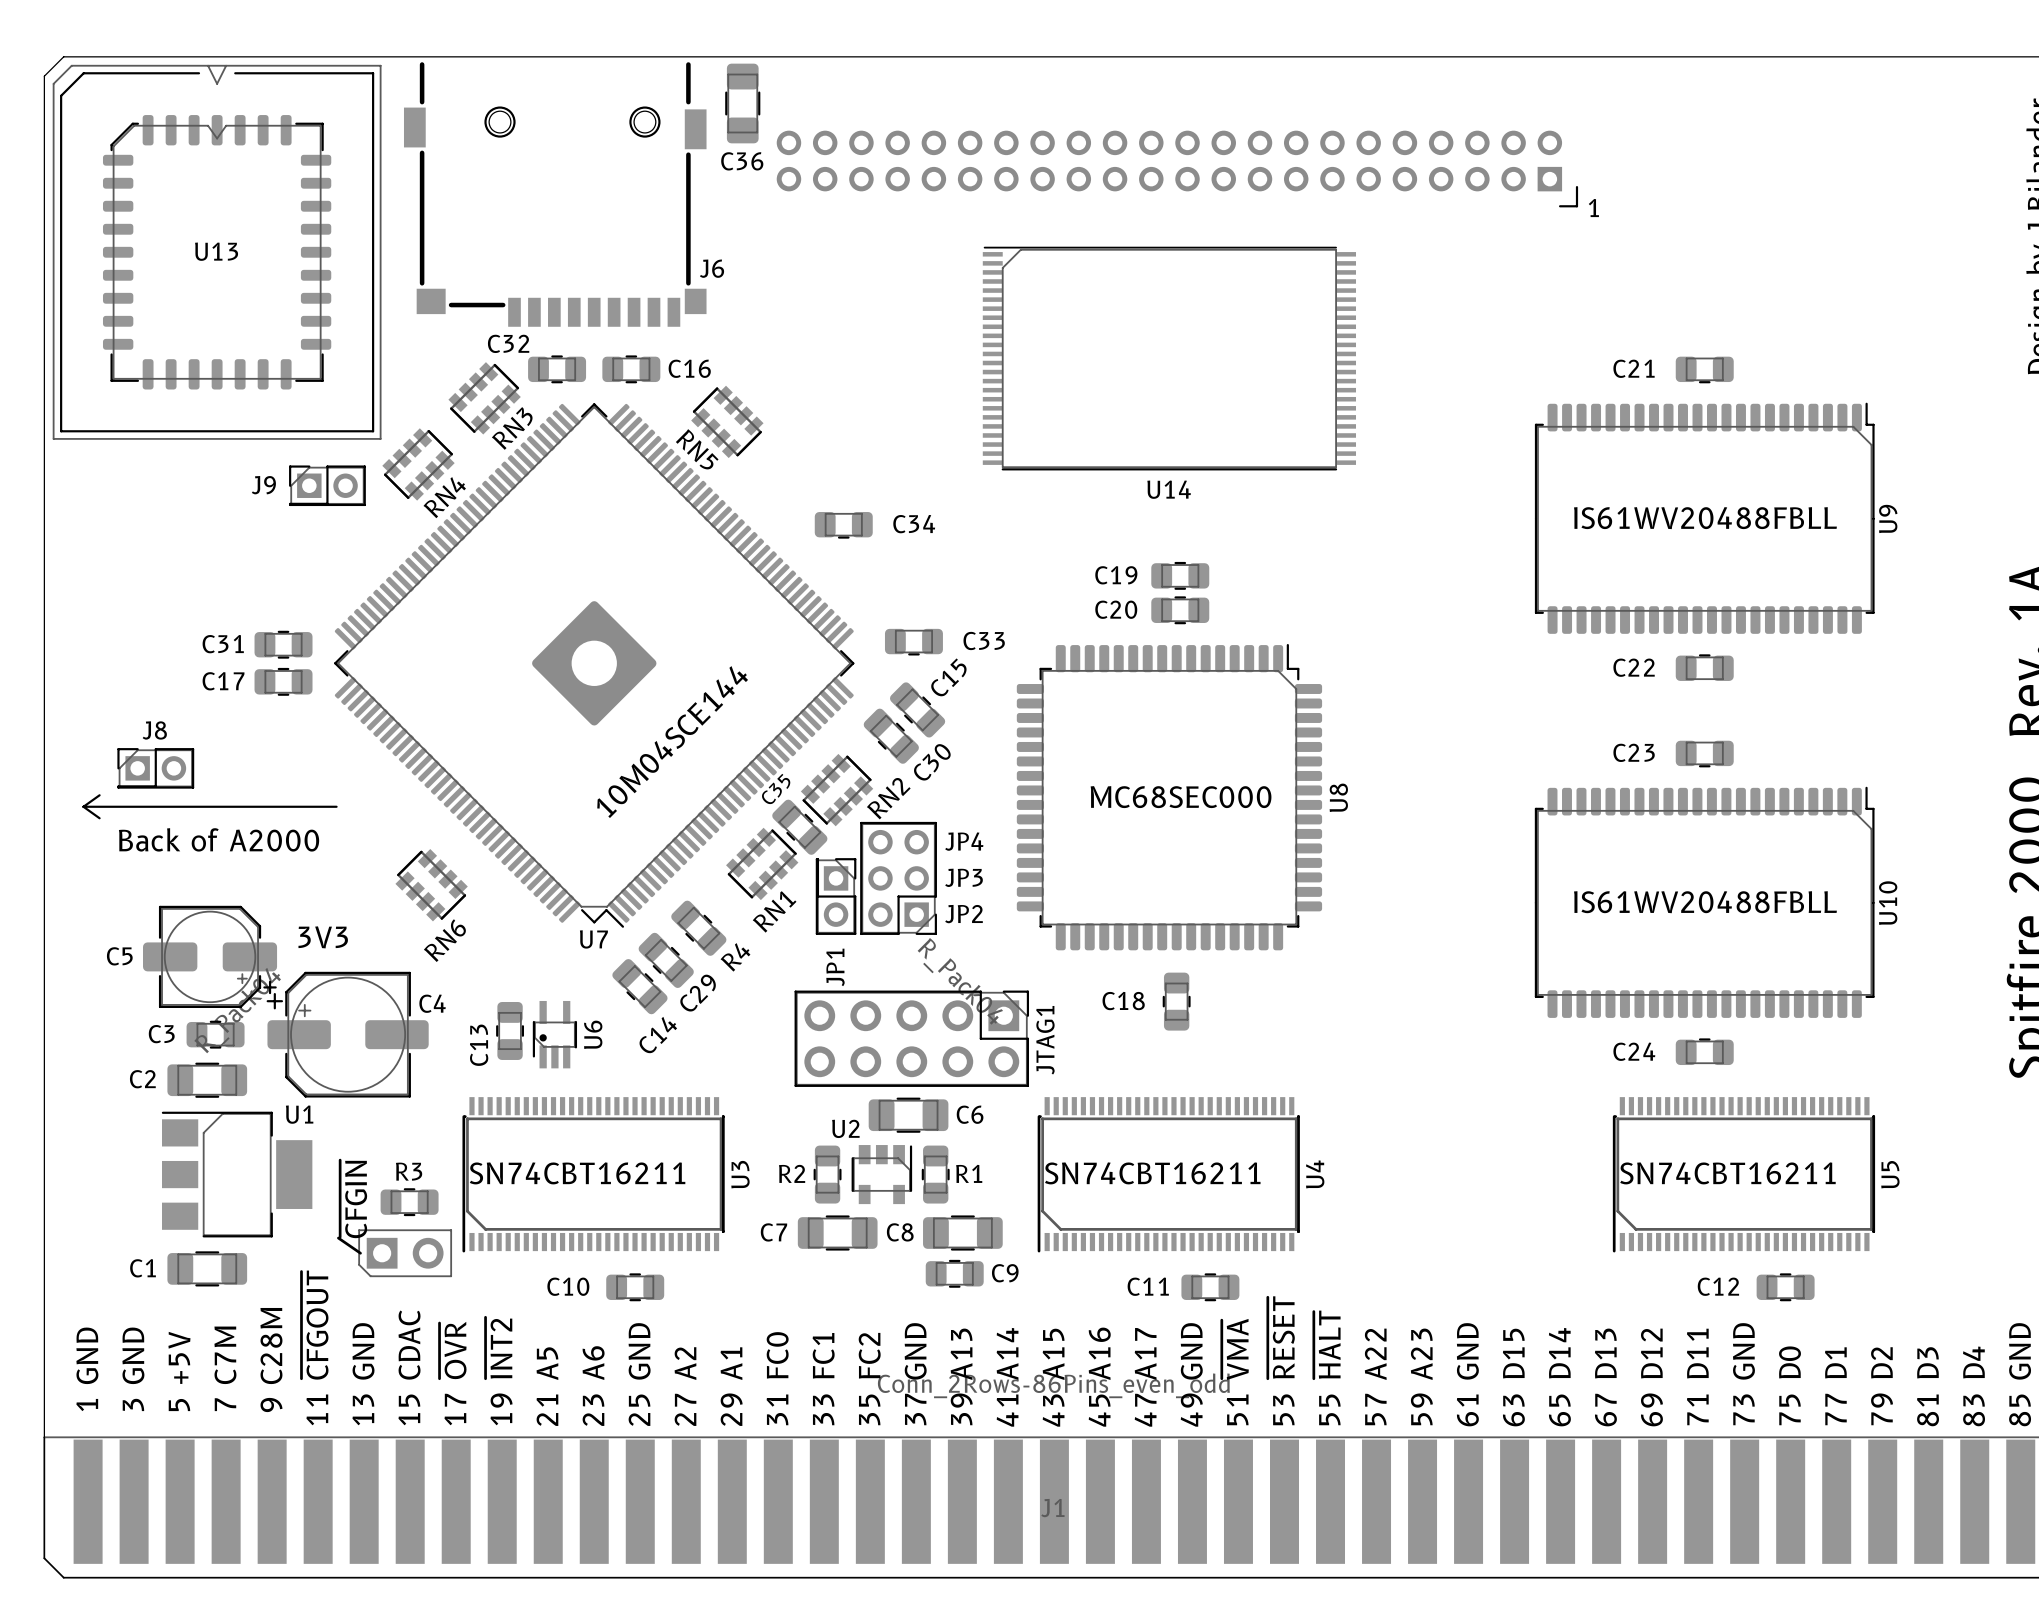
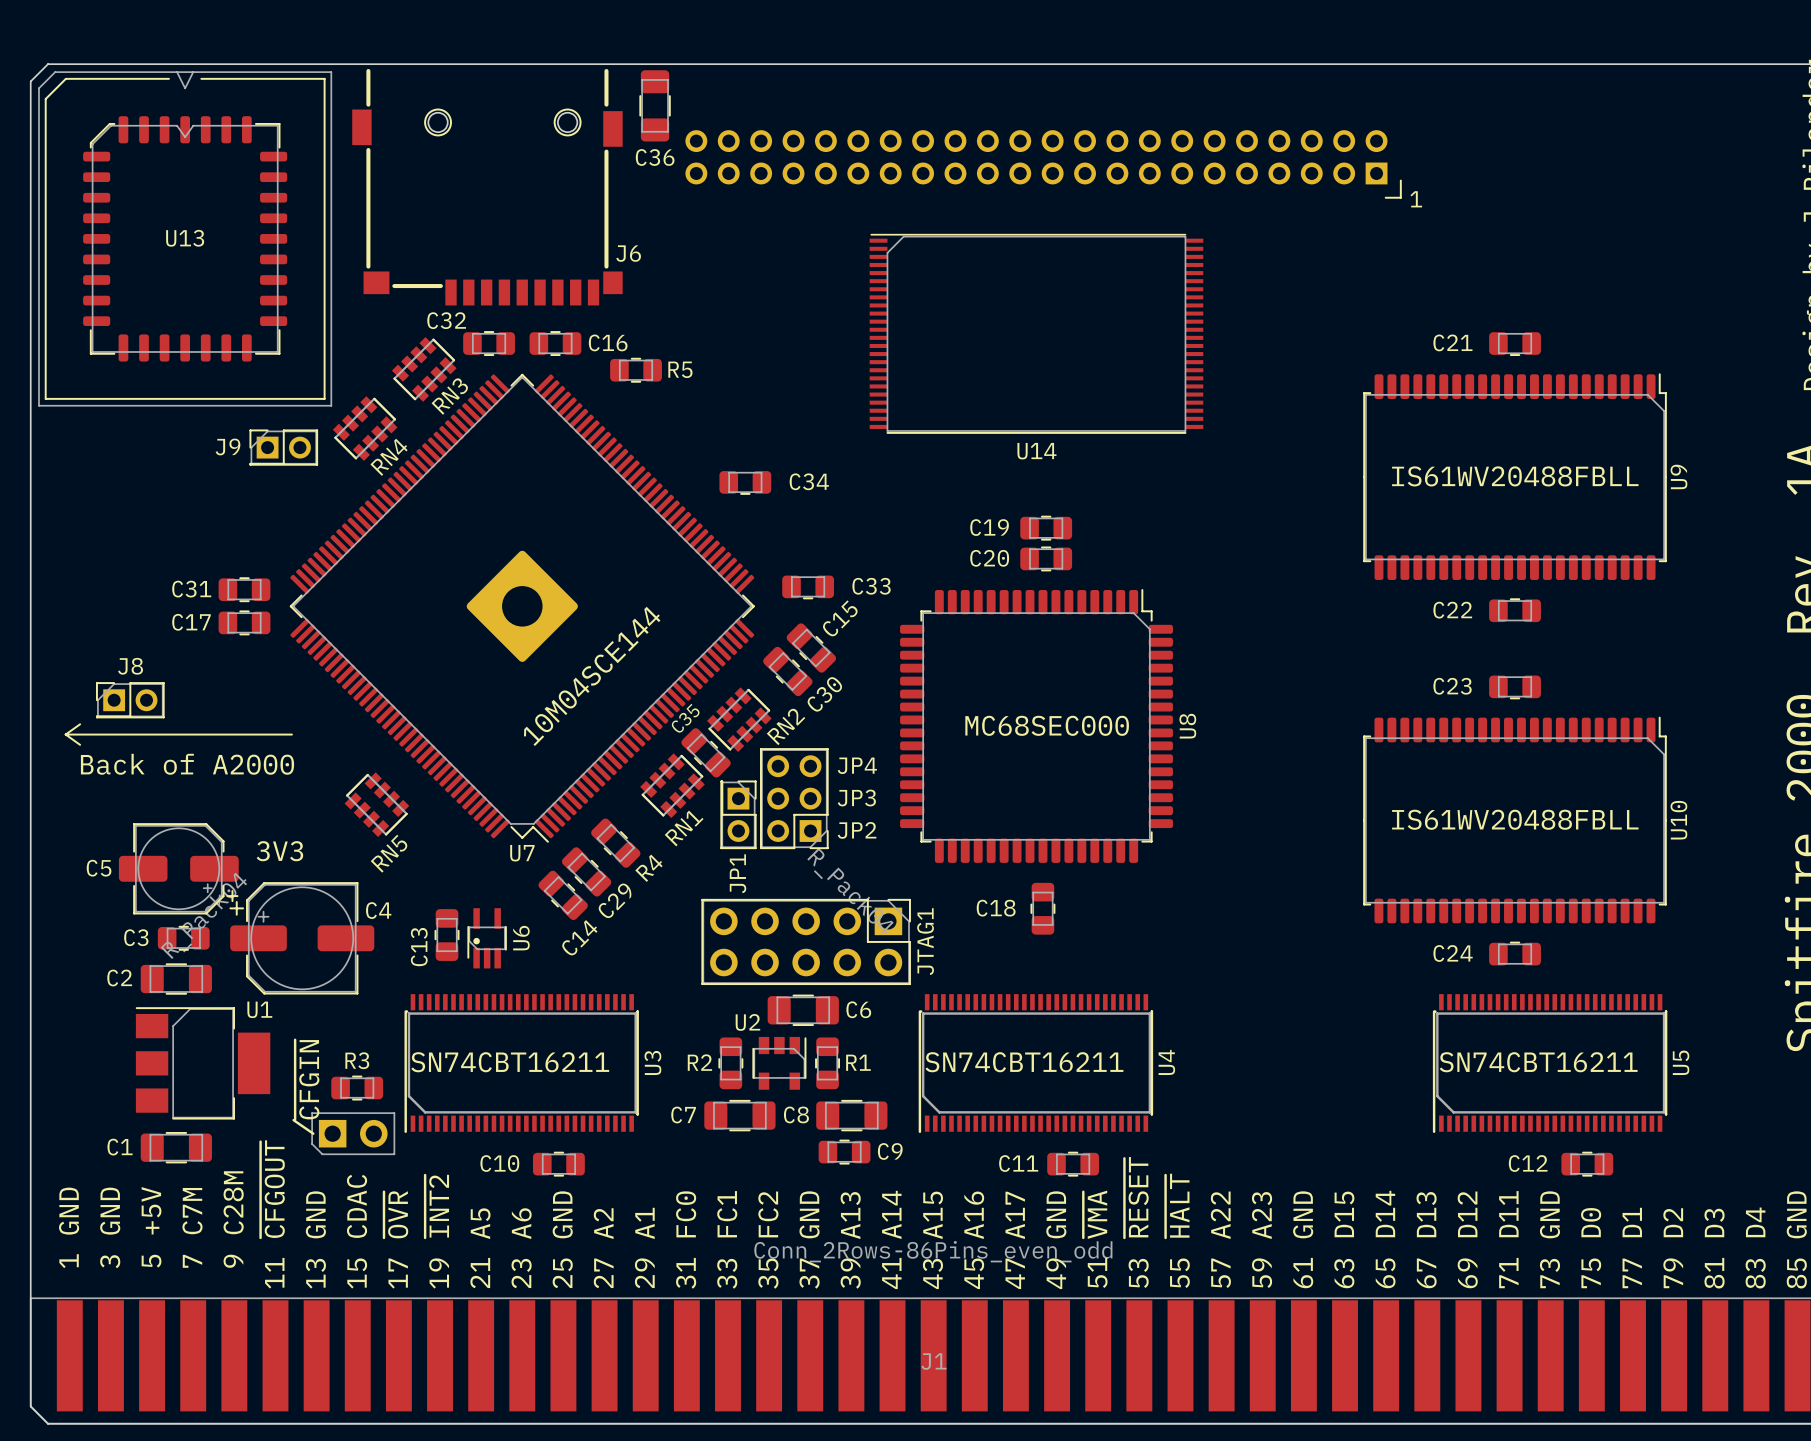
R5: none -> (636, 370)
RN5: (727, 421) -> none
RN6 name: RN6 (444, 940) -> RN5 (389, 853)

